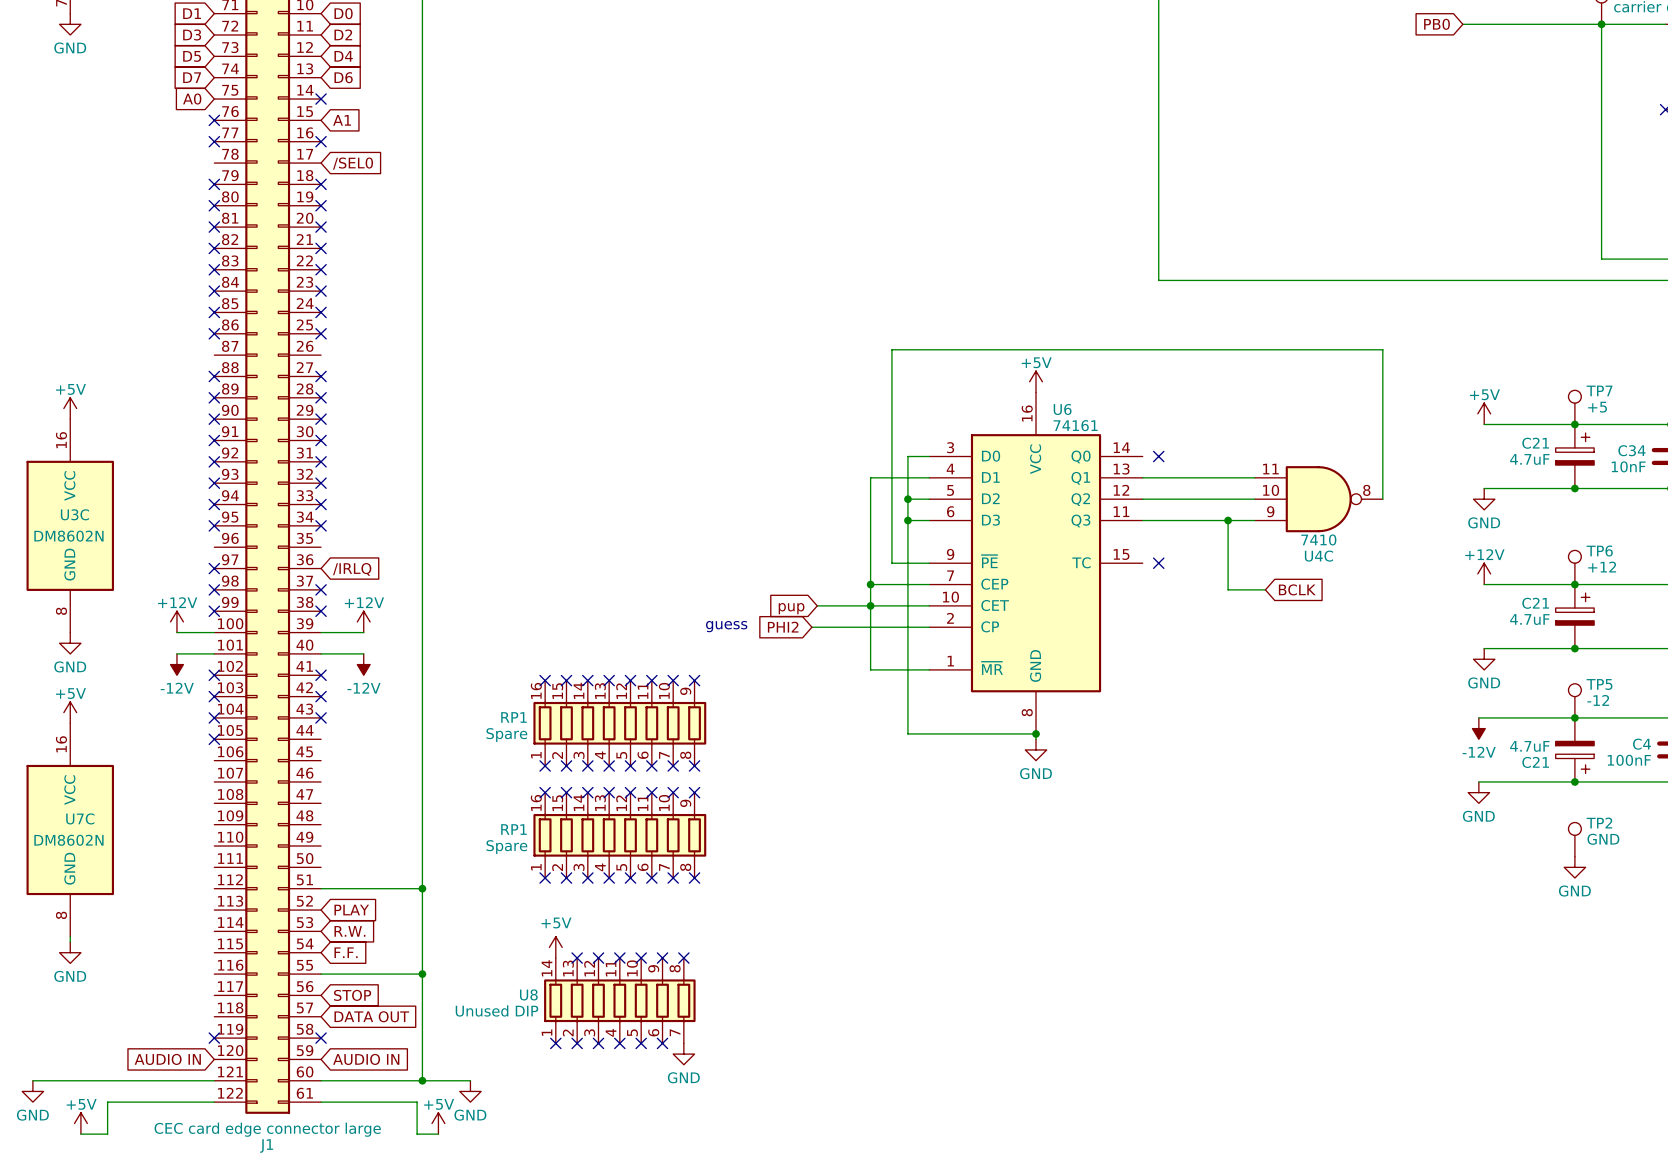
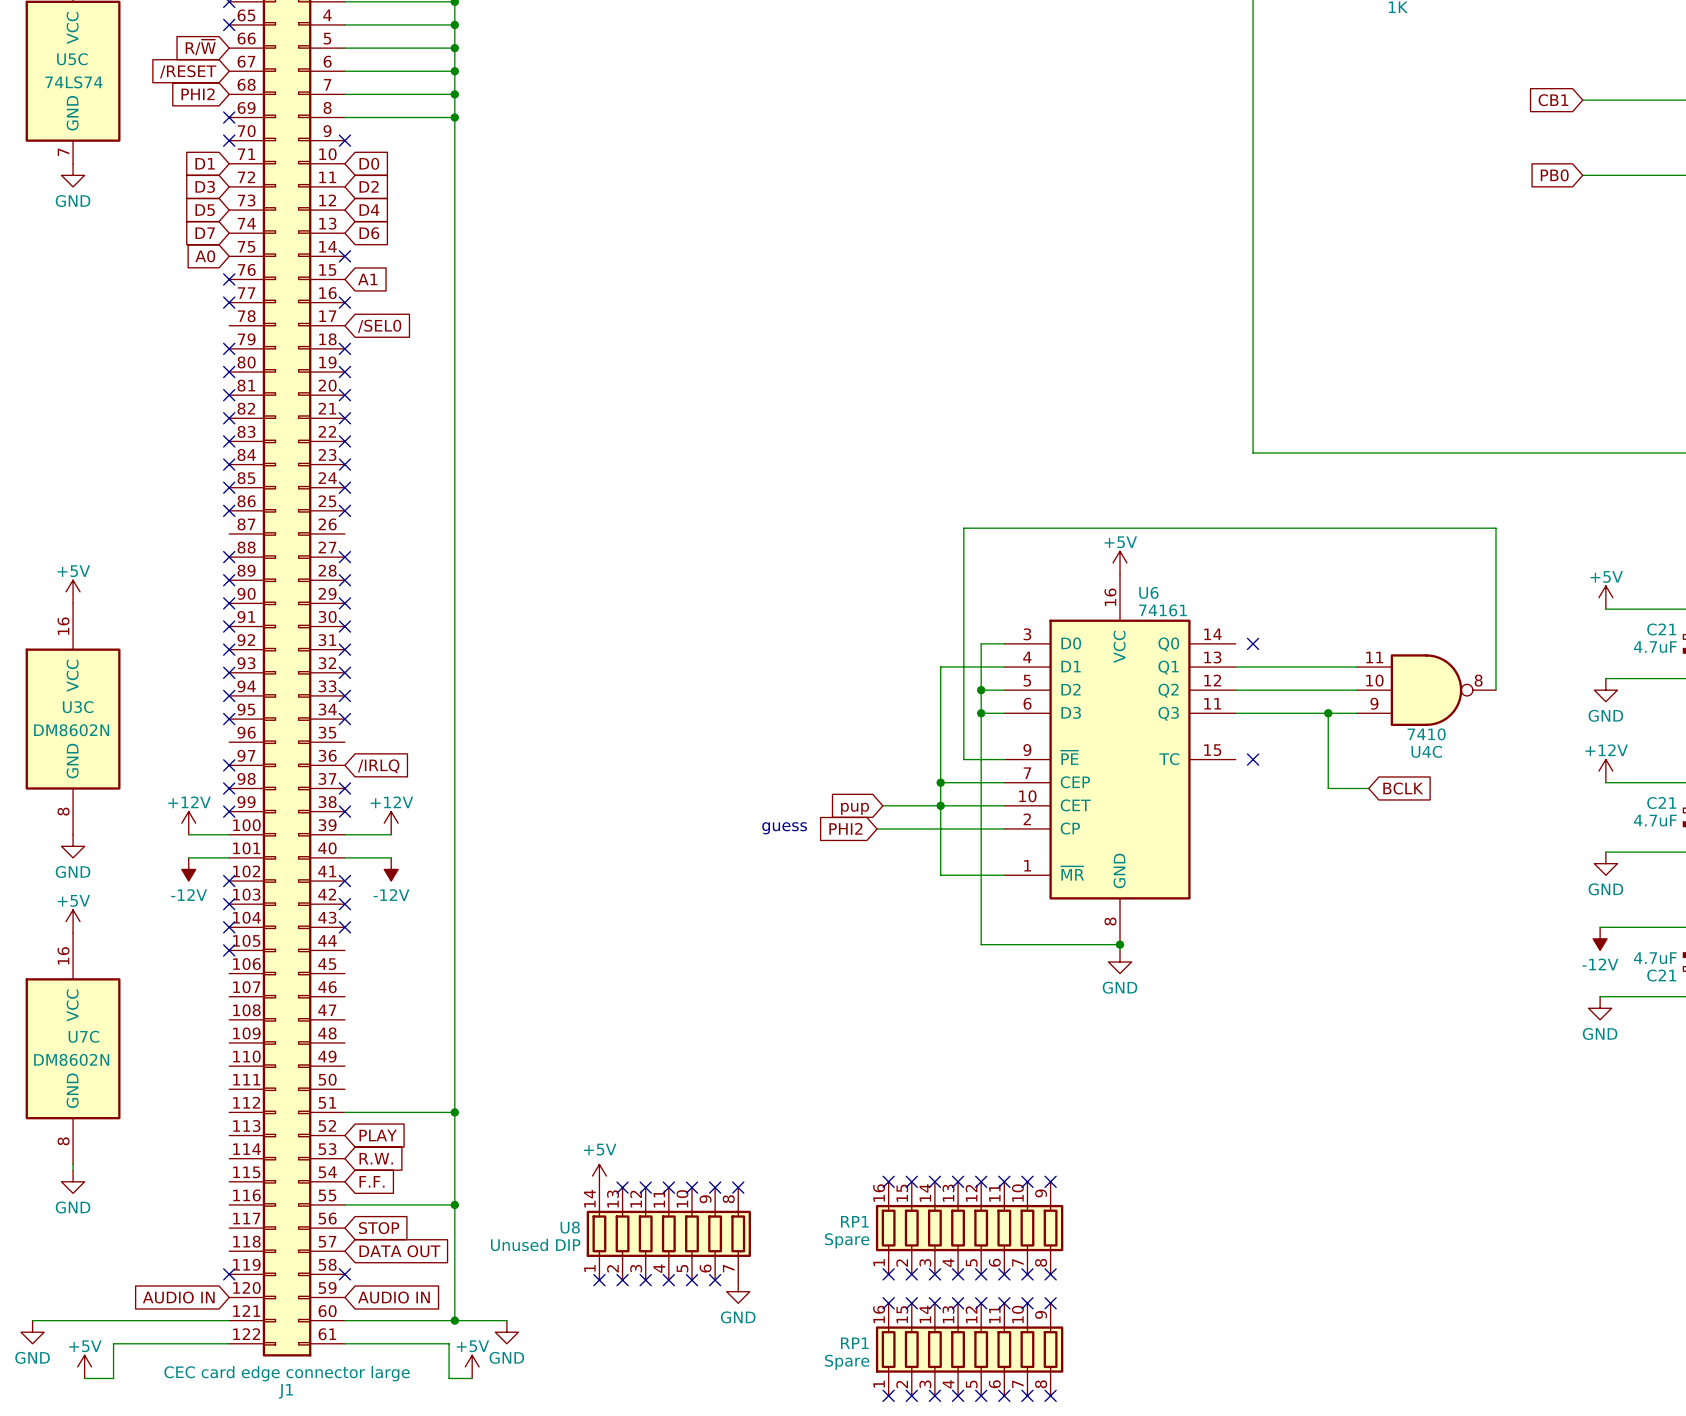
no-connect mark: (545, 680) -> none
no-connect mark: (566, 680) -> none
no-connect mark: (587, 680) -> none
no-connect mark: (609, 680) -> none
no-connect mark: (630, 680) -> none
no-connect mark: (651, 680) -> none
no-connect mark: (673, 680) -> none
no-connect mark: (694, 680) -> none
RP1: Spare (619, 723) -> none
no-connect mark: (545, 765) -> none
no-connect mark: (566, 765) -> none
no-connect mark: (587, 765) -> none
no-connect mark: (609, 765) -> none
no-connect mark: (630, 765) -> none
no-connect mark: (651, 765) -> none
no-connect mark: (673, 765) -> none
no-connect mark: (694, 765) -> none
no-connect mark: (545, 792) -> none
no-connect mark: (566, 792) -> none
no-connect mark: (587, 792) -> none
no-connect mark: (609, 792) -> none
no-connect mark: (630, 792) -> none
no-connect mark: (651, 792) -> none
no-connect mark: (673, 792) -> none
no-connect mark: (694, 792) -> none
RP1: Spare (619, 835) -> none
no-connect mark: (545, 878) -> none
no-connect mark: (566, 878) -> none
no-connect mark: (587, 878) -> none
no-connect mark: (609, 878) -> none
no-connect mark: (630, 878) -> none
no-connect mark: (651, 878) -> none
no-connect mark: (673, 878) -> none
no-connect mark: (694, 878) -> none
no-connect mark: none -> (888, 1181)
no-connect mark: none -> (911, 1181)
no-connect mark: none -> (934, 1181)
no-connect mark: none -> (958, 1181)
no-connect mark: none -> (981, 1181)
no-connect mark: none -> (1004, 1181)
no-connect mark: none -> (1027, 1181)
no-connect mark: none -> (1050, 1181)
RP1: none -> Spare (969, 1228)
no-connect mark: none -> (888, 1274)
no-connect mark: none -> (911, 1274)
no-connect mark: none -> (934, 1274)
no-connect mark: none -> (958, 1274)
no-connect mark: none -> (981, 1274)
no-connect mark: none -> (1004, 1274)
no-connect mark: none -> (1027, 1274)
no-connect mark: none -> (1050, 1274)
no-connect mark: none -> (888, 1303)
no-connect mark: none -> (911, 1303)
no-connect mark: none -> (934, 1303)
no-connect mark: none -> (958, 1303)
no-connect mark: none -> (981, 1303)
no-connect mark: none -> (1004, 1303)
no-connect mark: none -> (1027, 1303)
no-connect mark: none -> (1050, 1303)
RP1: none -> Spare (969, 1349)
no-connect mark: none -> (888, 1395)
no-connect mark: none -> (911, 1395)
no-connect mark: none -> (934, 1395)
no-connect mark: none -> (958, 1395)
no-connect mark: none -> (981, 1395)
no-connect mark: none -> (1004, 1395)
no-connect mark: none -> (1027, 1395)
no-connect mark: none -> (1050, 1395)

